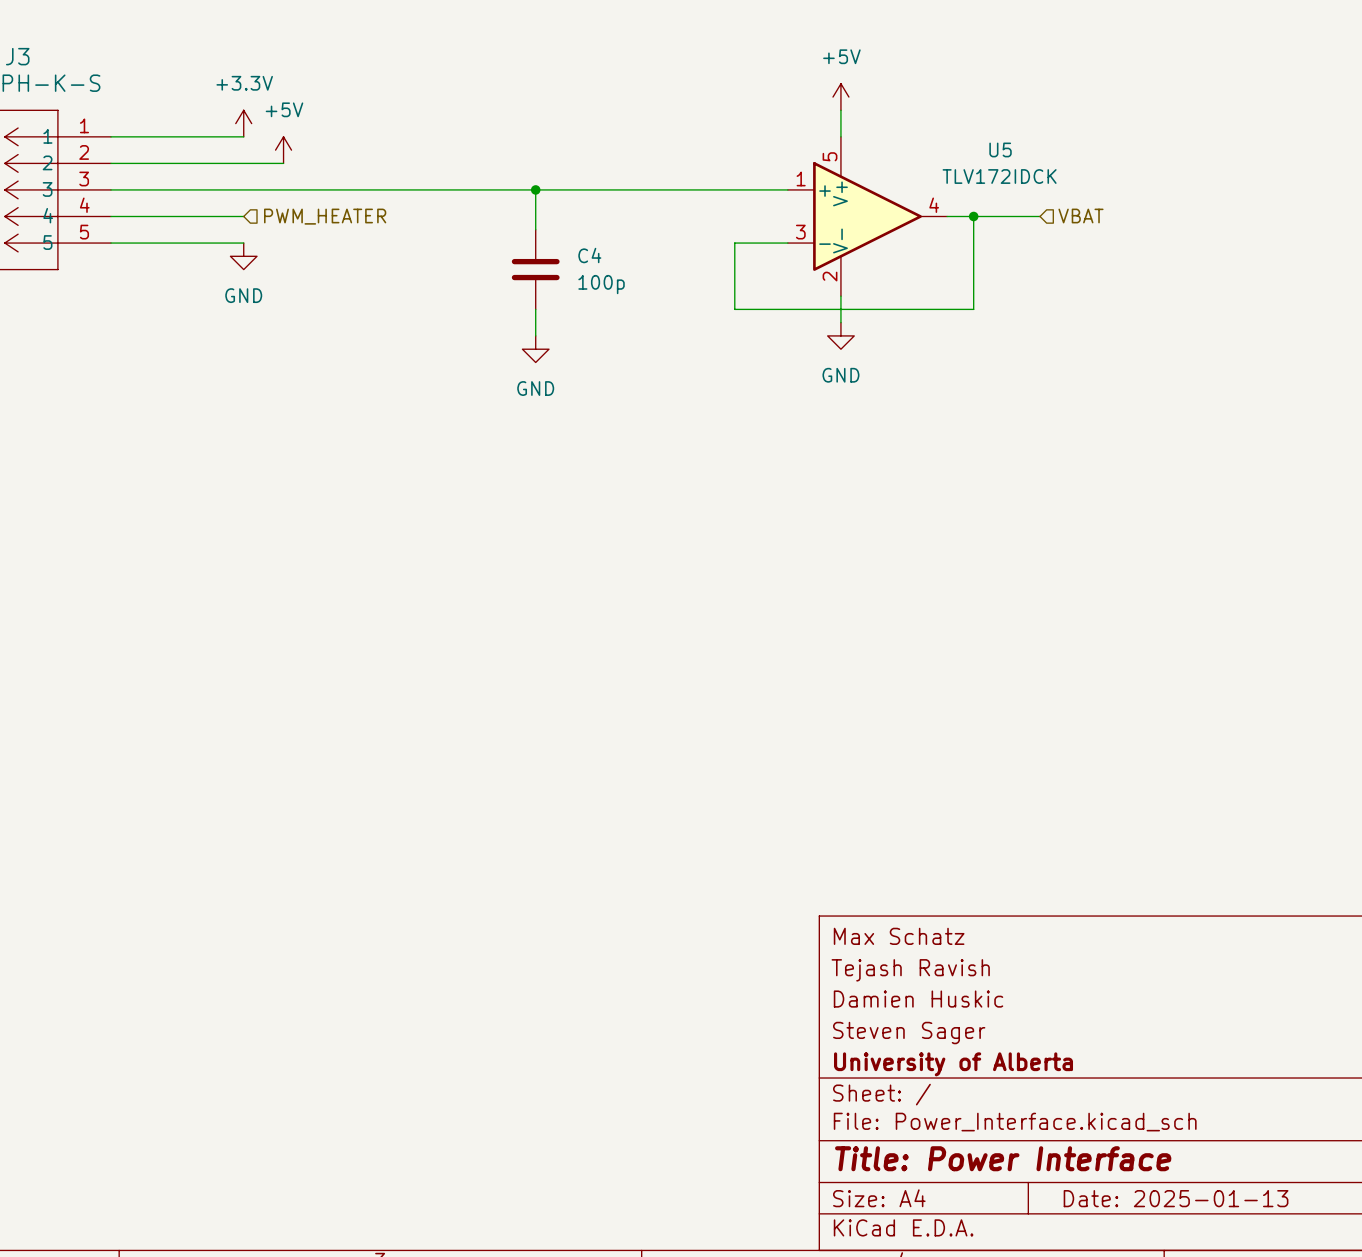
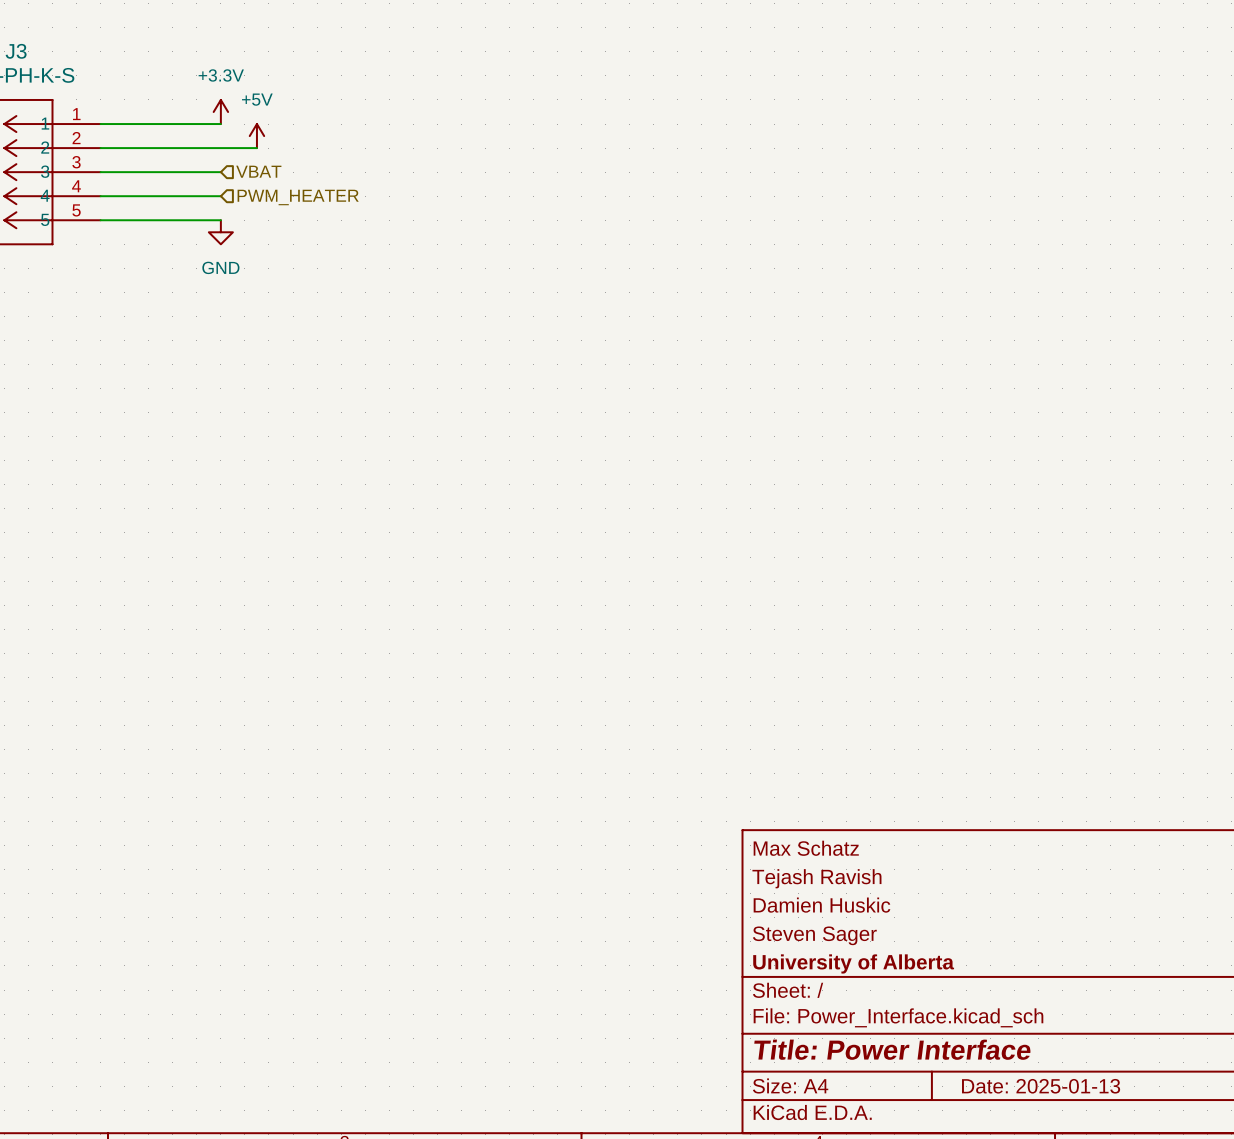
power symbol: +5V (840, 97) -> none
wire: (840, 110) (840, 136) -> none
wire: (243, 189) (787, 189) -> none
hierarchical label: none -> VBAT (258, 171)
wire: (535, 189) (535, 229) -> none
junction: (535, 189) -> none
U5: TLV172IDCK (867, 216) -> none
wire: (947, 216) (1040, 216) -> none
wire: (973, 216) (973, 309) (734, 309) (734, 243) (787, 243) -> none
junction: (973, 216) -> none
hierarchical label: VBAT (1081, 216) -> none
C4: 100p (535, 269) -> none
wire: (840, 296) (840, 322) -> none
wire: (535, 309) (535, 335) -> none
power symbol: GND (840, 335) -> none
power symbol: GND (535, 349) -> none

